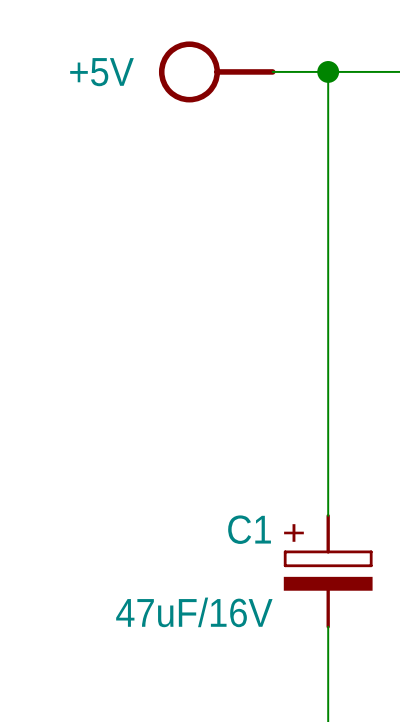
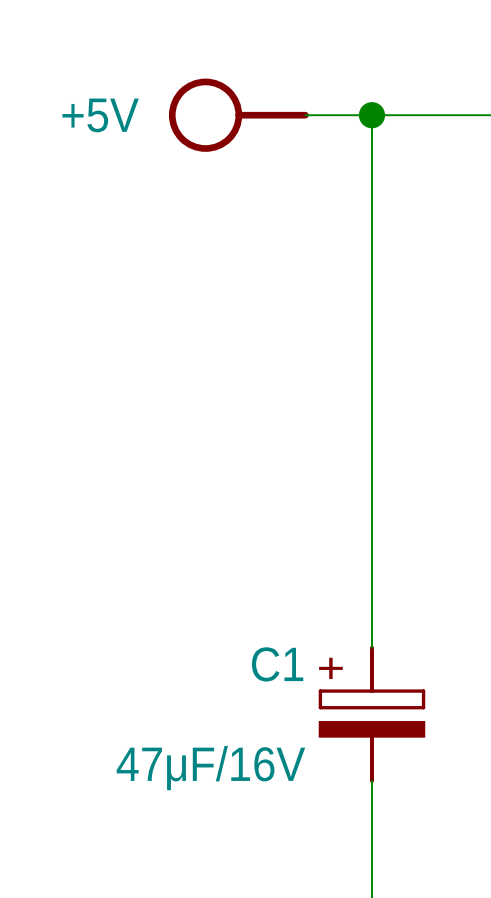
C1 value: 47uF/16V (194, 612) -> 47μF/16V (210, 768)

